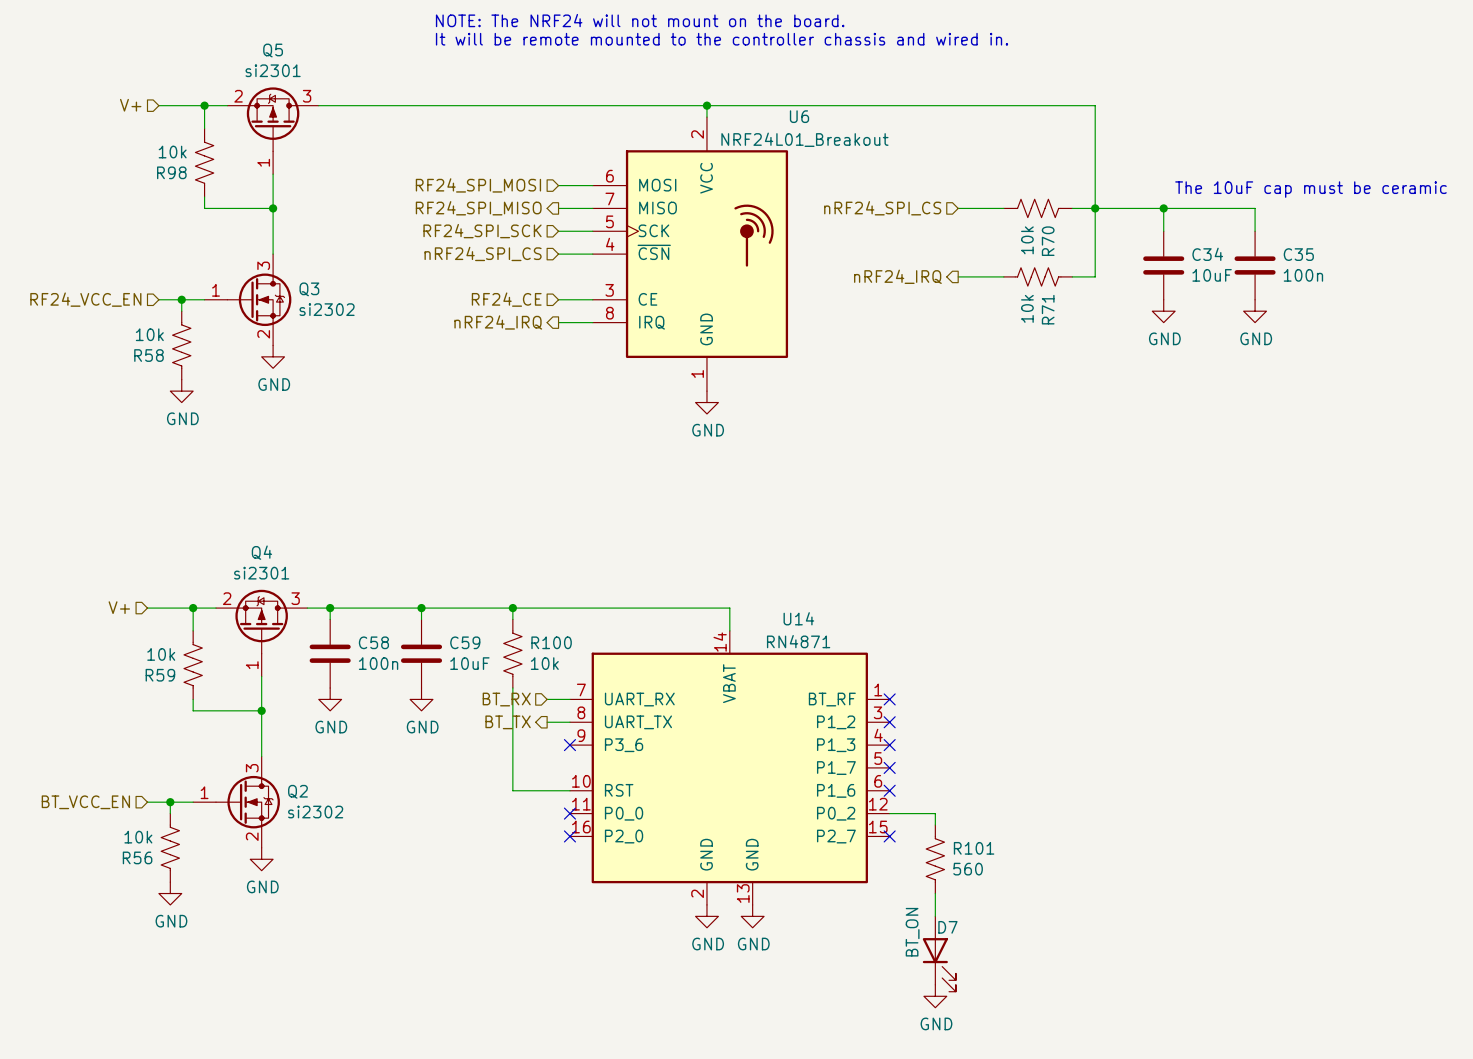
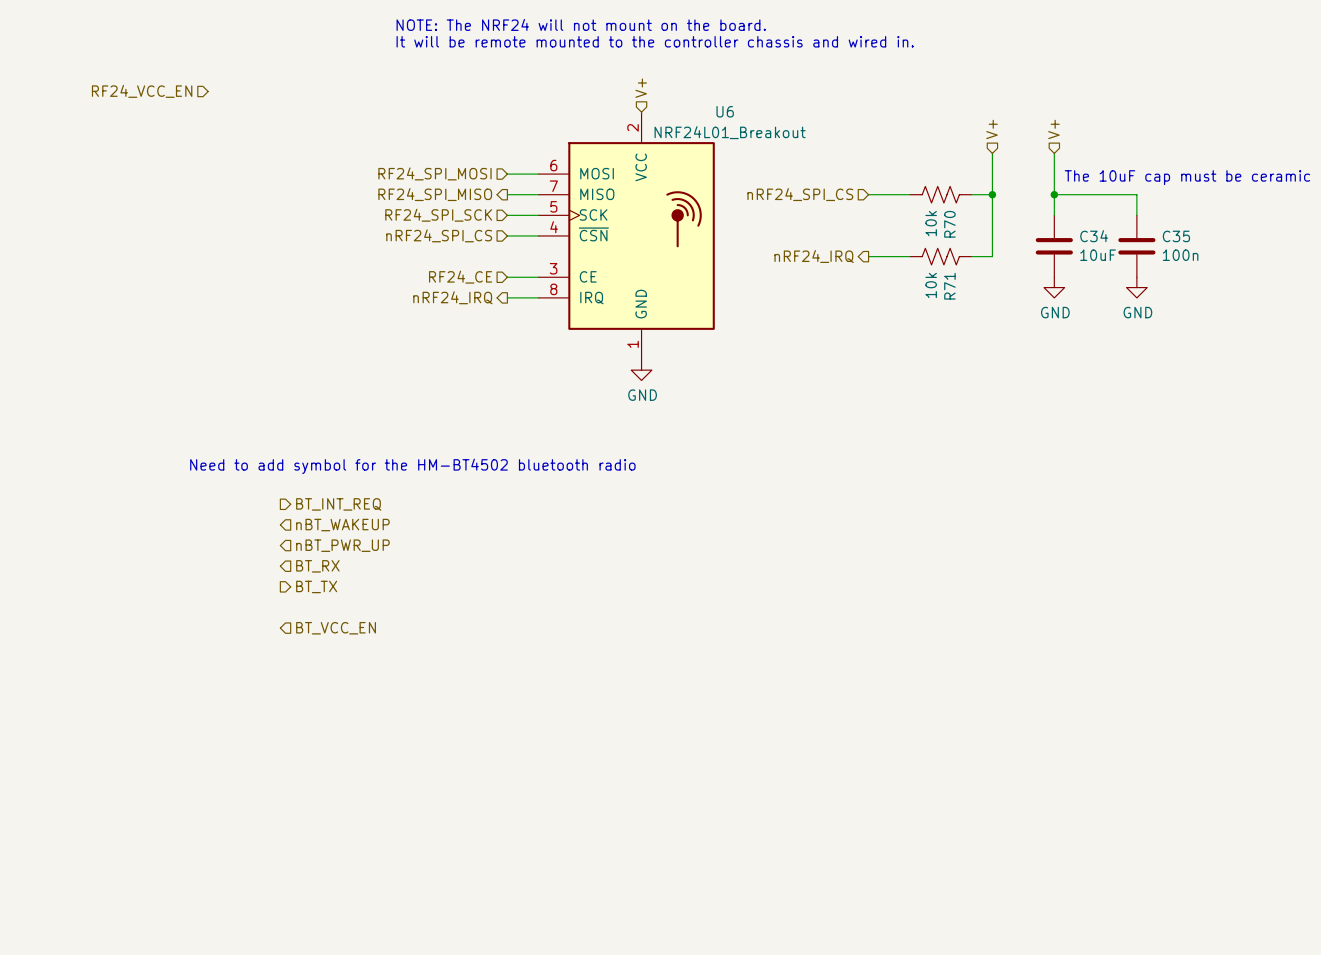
hierarchical label: none -> V+ (641, 88)
hierarchical label: V+ (130, 105) -> none
wire: (158, 105) (227, 105) -> none
wire: (204, 105) (204, 128) -> none
junction: (204, 105) -> none
wire: (318, 105) (1095, 105) (1095, 162) -> none
wire: (706, 105) (706, 117) -> none
junction: (706, 105) -> none
Q5: si2301 (273, 130) -> none
hierarchical label: none -> V+ (992, 129)
hierarchical label: none -> V+ (1053, 129)
R98: 10k (204, 162) -> none
wire: (273, 174) (273, 254) -> none
wire: (204, 197) (204, 208) (273, 208) -> none
junction: (273, 208) -> none
wire: (1095, 208) (1163, 208) -> (1054, 153) (1054, 194)
hierarchical label position: RF24_VCC_EN (85, 299) -> RF24_VCC_EN (142, 91)
wire: (158, 299) (204, 299) -> none
wire: (181, 299) (181, 311) -> none
junction: (181, 299) -> none
Q3: si2302 (247, 299) -> none
R58: 10k (181, 345) -> none
power symbol: GND (273, 356) -> none
power symbol: GND (181, 391) -> none
text: none -> Need to add symbol for the HM-BT4502 bluetooth radio (412, 466)
hierarchical label: none -> BT_INT_REQ (338, 504)
hierarchical label: none -> nBT_WAKEUP (342, 525)
hierarchical label: none -> nBT_PWR_UP (342, 545)
hierarchical label: V+ (119, 607) -> none
wire: (147, 608) (215, 608) -> none
wire: (193, 608) (193, 630) -> none
junction: (193, 608) -> none
wire: (307, 608) (729, 608) (729, 630) -> none
wire: (330, 608) (330, 619) -> none
junction: (330, 608) -> none
wire: (421, 608) (421, 619) -> none
junction: (421, 608) -> none
wire: (512, 608) (512, 619) -> none
junction: (512, 608) -> none
hierarchical label: none -> BT_RX (317, 566)
Q4: si2301 (261, 633) -> none
hierarchical label: none -> BT_TX (316, 586)
C58: 100n (330, 653) -> none
C59: 10uF (421, 653) -> none
R100: 10k (512, 653) -> none
R59: 10k (193, 665) -> none
wire: (261, 676) (261, 756) -> none
wire: (512, 687) (512, 790) (569, 790) -> none
wire: (193, 699) (193, 710) (261, 710) -> none
power symbol: GND (330, 699) -> none
power symbol: GND (421, 699) -> none
hierarchical label: BT_RX (506, 699) -> none
wire: (547, 699) (569, 699) -> none
no-connect mark: (889, 699) -> none
junction: (261, 710) -> none
hierarchical label: BT_TX (508, 722) -> none
wire: (547, 722) (569, 722) -> none
no-connect mark: (889, 722) -> none
no-connect mark: (569, 745) -> none
no-connect mark: (889, 745) -> none
U14: RN4871 (729, 767) -> none
no-connect mark: (889, 767) -> none
no-connect mark: (889, 790) -> none
hierarchical label rotation: 0° (85, 802) -> 180° (336, 628)
hierarchical label position: BT_VCC_EN (85, 802) -> BT_VCC_EN (336, 628)
wire: (147, 802) (193, 802) -> none
wire: (170, 802) (170, 813) -> none
junction: (170, 802) -> none
Q2: si2302 (236, 802) -> none
no-connect mark: (569, 813) -> none
wire: (889, 813) (935, 813) (935, 825) -> none
no-connect mark: (569, 836) -> none
no-connect mark: (889, 836) -> none
R56: 10k (170, 847) -> none
power symbol: GND (261, 859) -> none
R101: 560 (935, 859) -> none
power symbol: GND (170, 893) -> none
wire: (935, 893) (935, 916) -> none
power symbol: GND (706, 916) -> none
power symbol: GND (752, 916) -> none
D7: BT_ON (939, 954) -> none
power symbol: GND (935, 996) -> none

